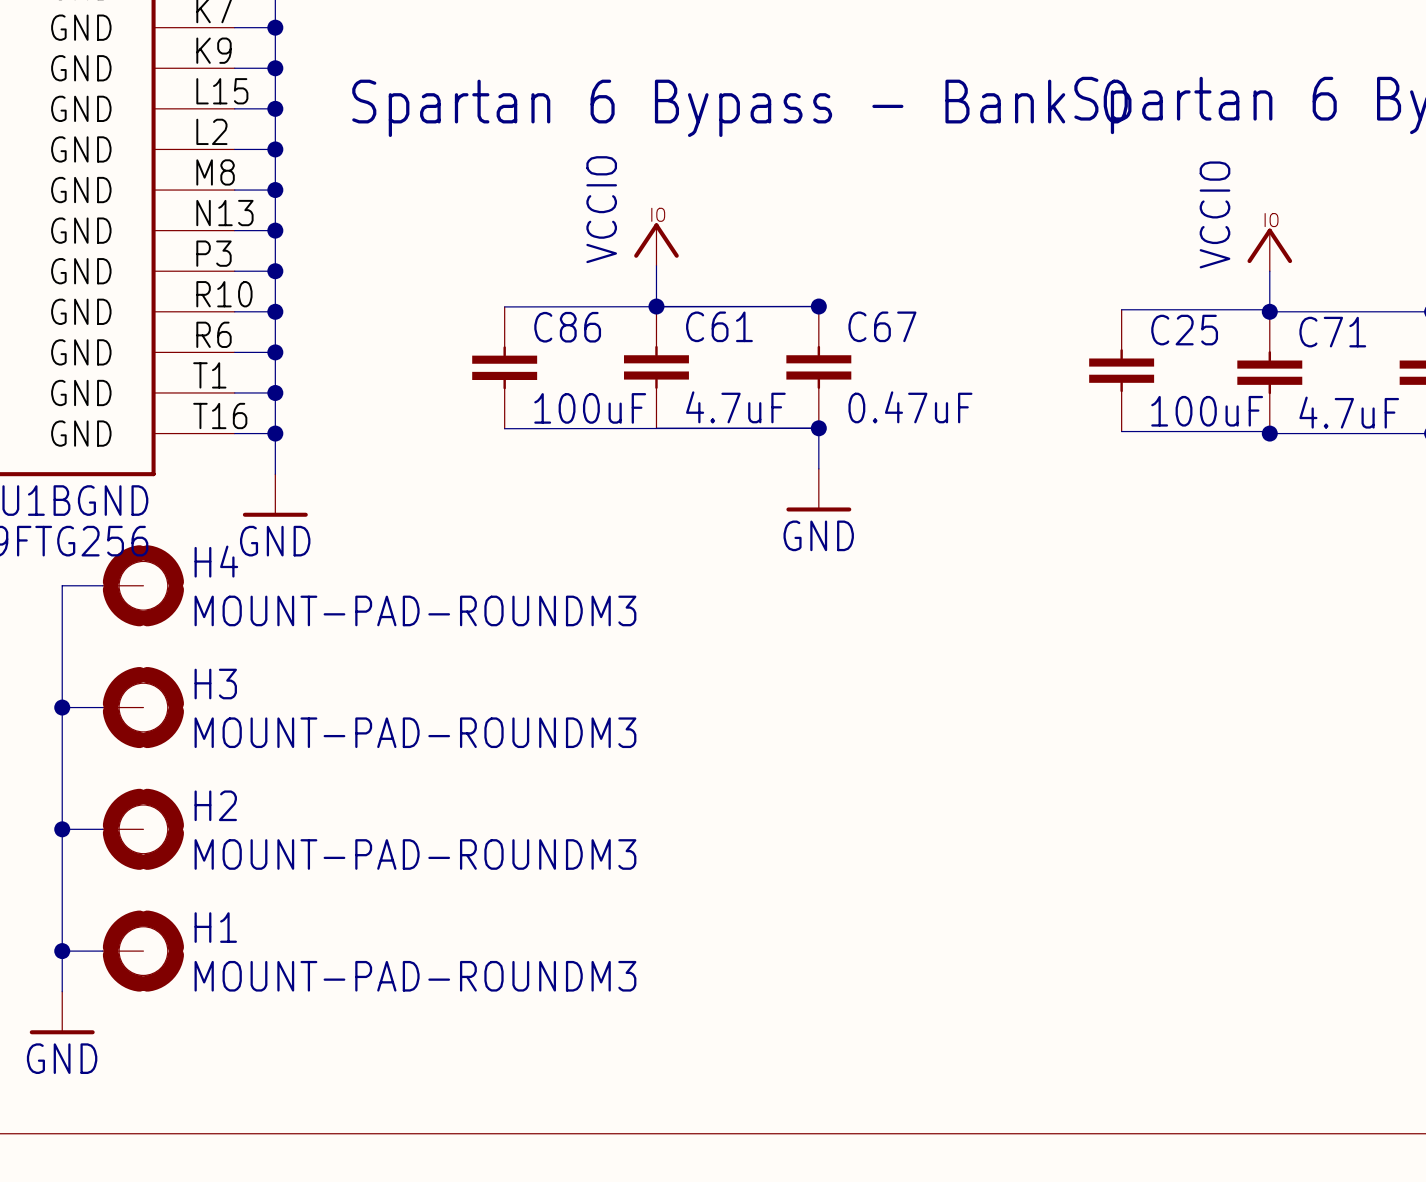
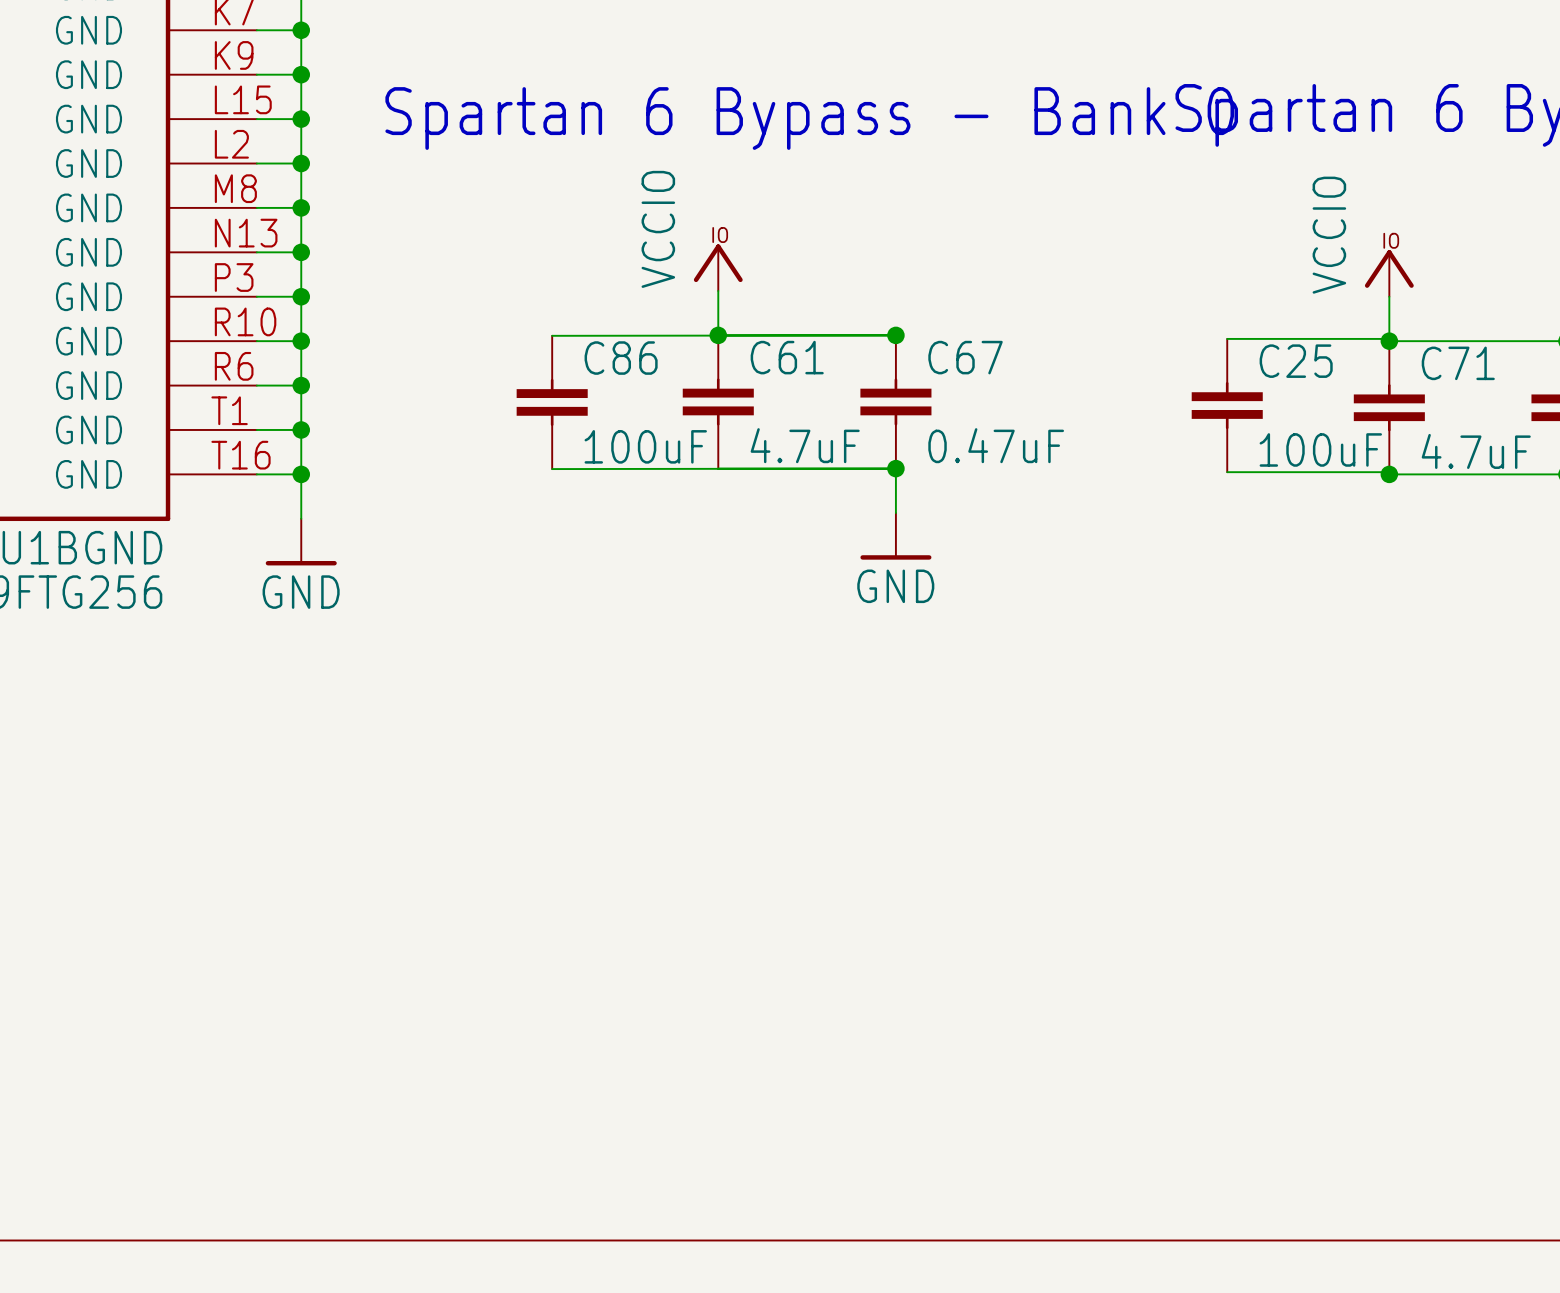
wire: (102, 585) (62, 585) (62, 991) -> none
H4: MOUNT-PAD-ROUNDM3 (143, 585) -> none
wire: (62, 707) (102, 707) -> none
junction: (62, 707) -> none
H3: MOUNT-PAD-ROUNDM3 (143, 707) -> none
wire: (62, 829) (102, 829) -> none
junction: (62, 829) -> none
H2: MOUNT-PAD-ROUNDM3 (143, 829) -> none
wire: (62, 951) (102, 951) -> none
junction: (62, 951) -> none
H1: MOUNT-PAD-ROUNDM3 (143, 951) -> none
power symbol: GND (62, 1012) -> none

